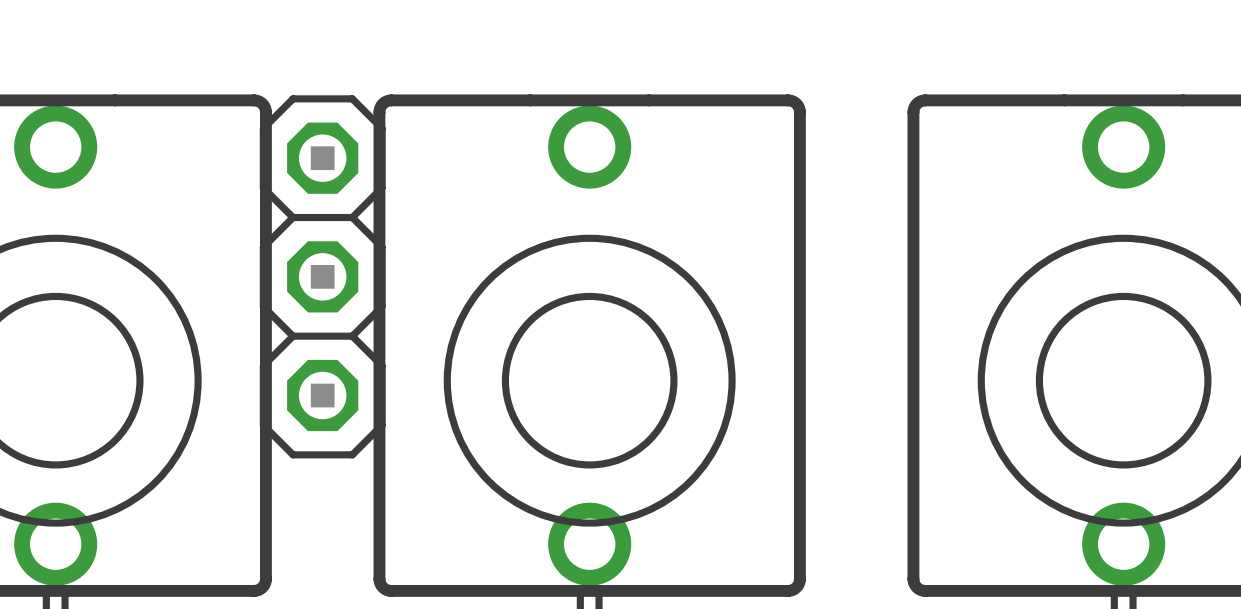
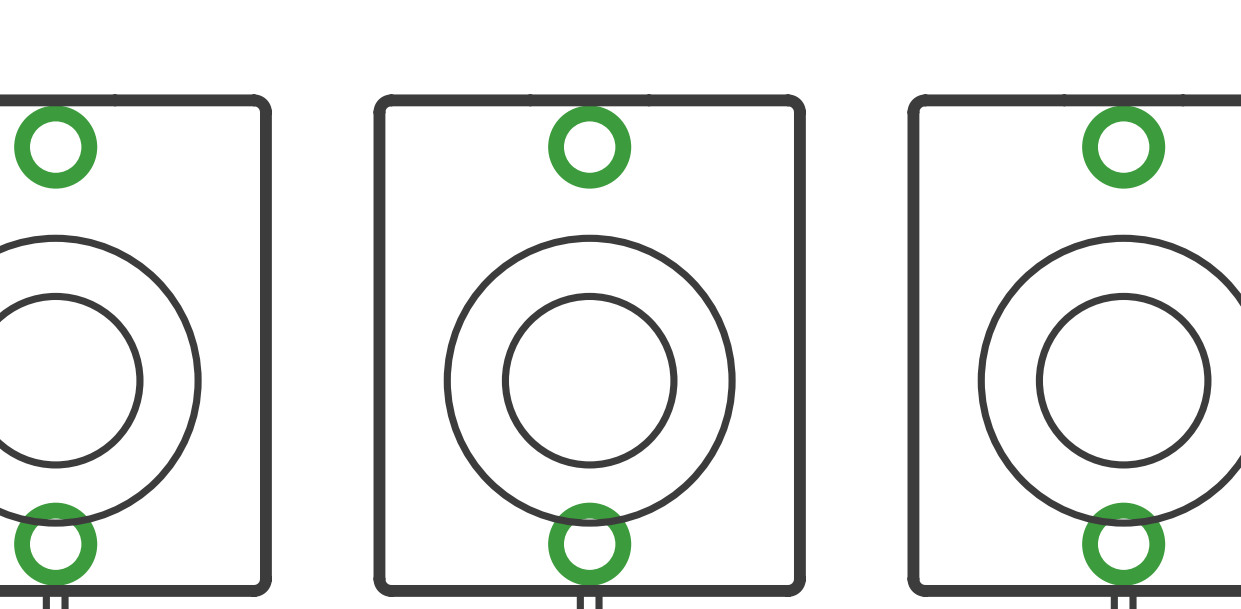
part: (322, 276) -> none

